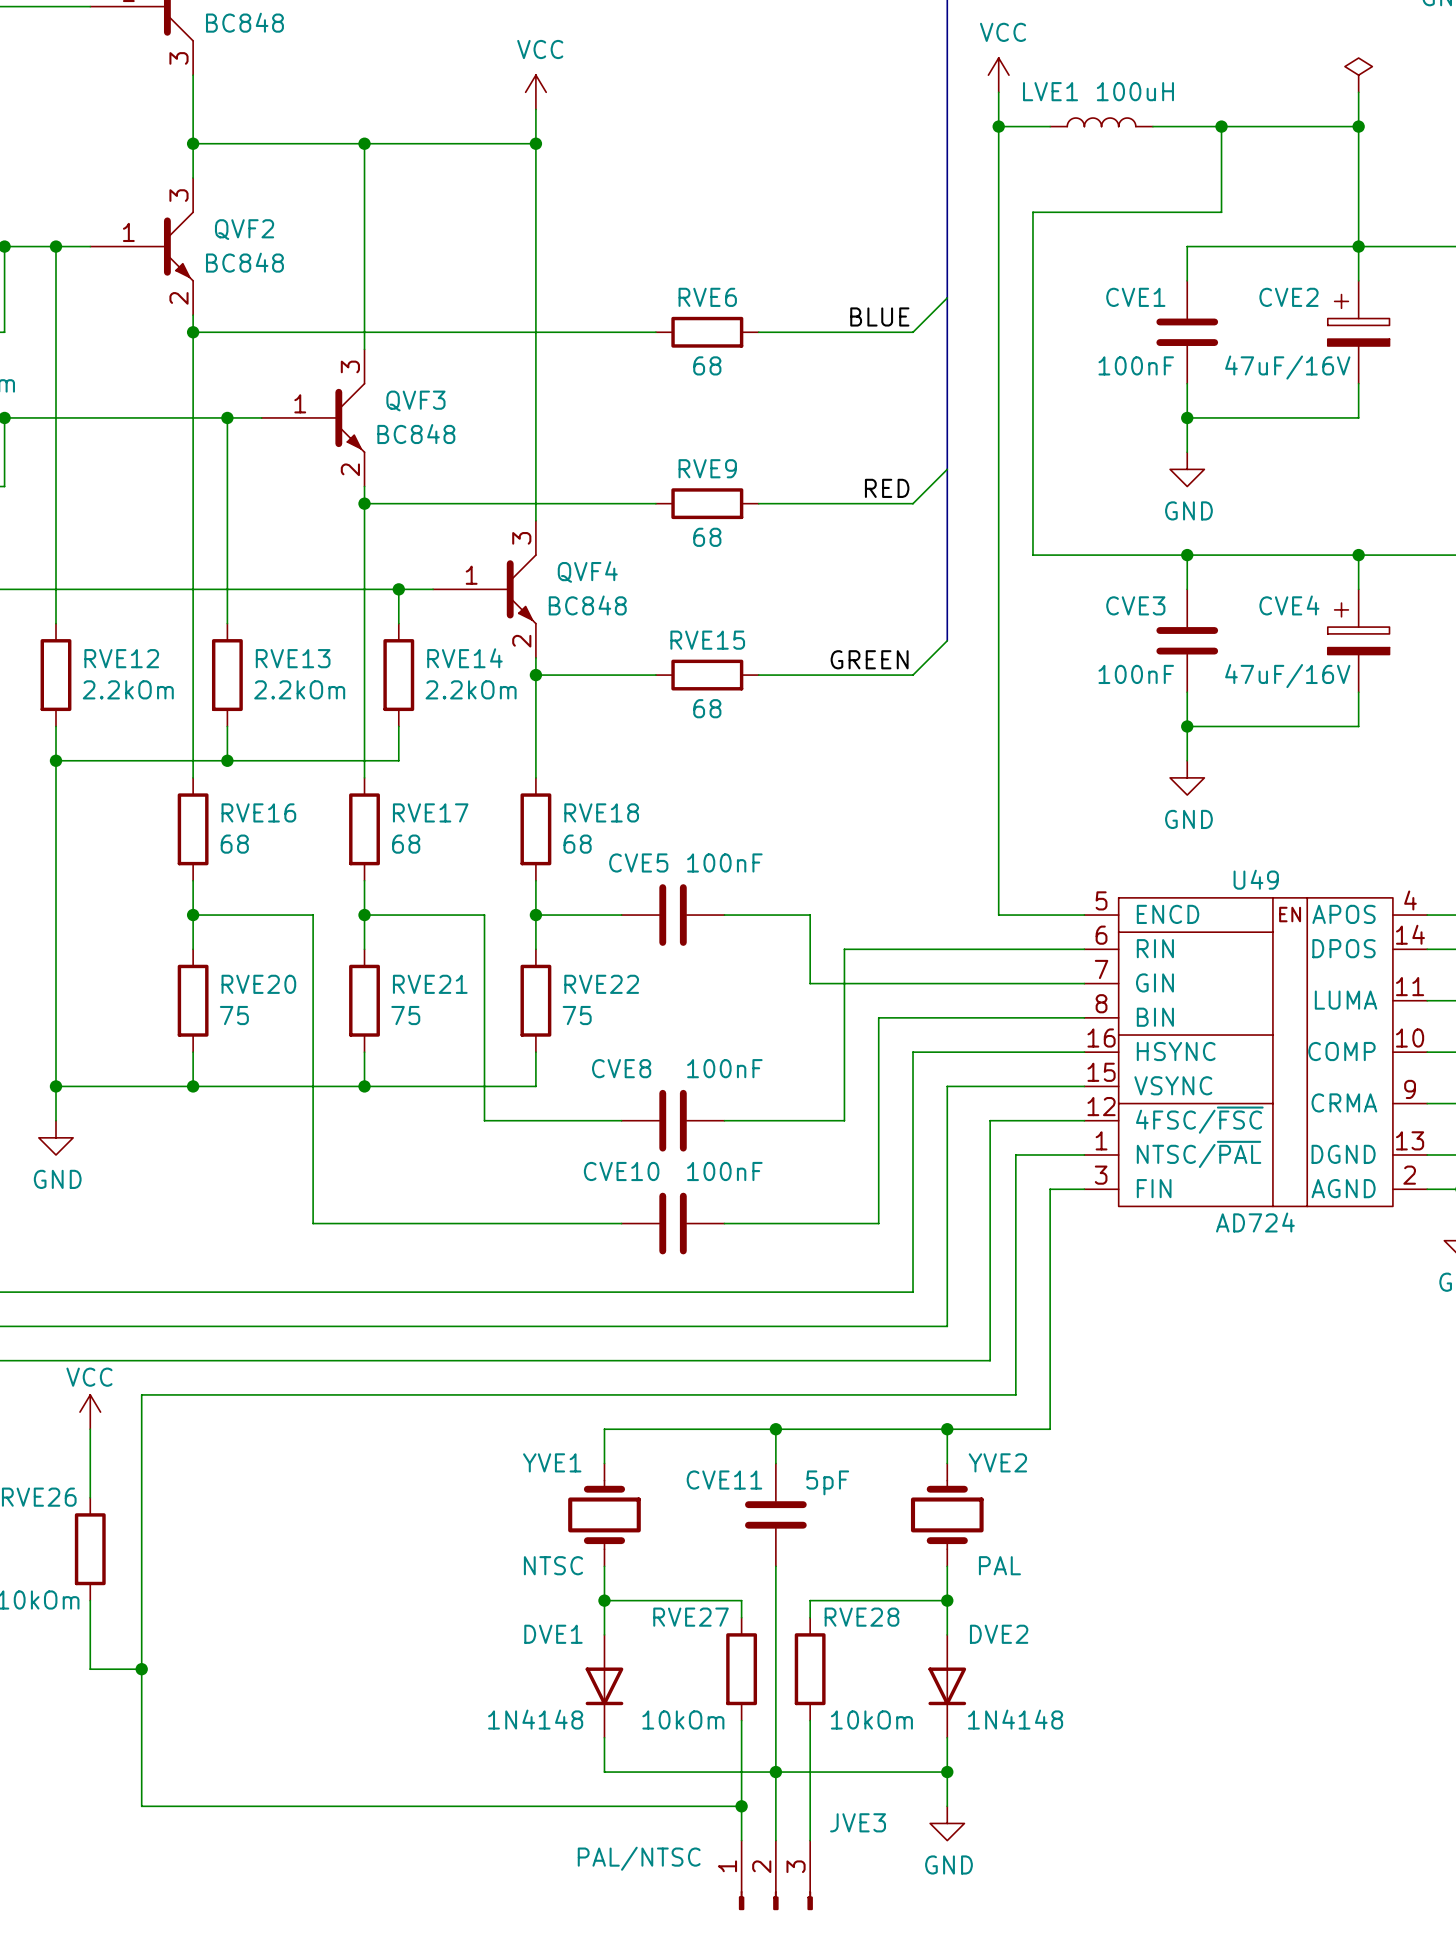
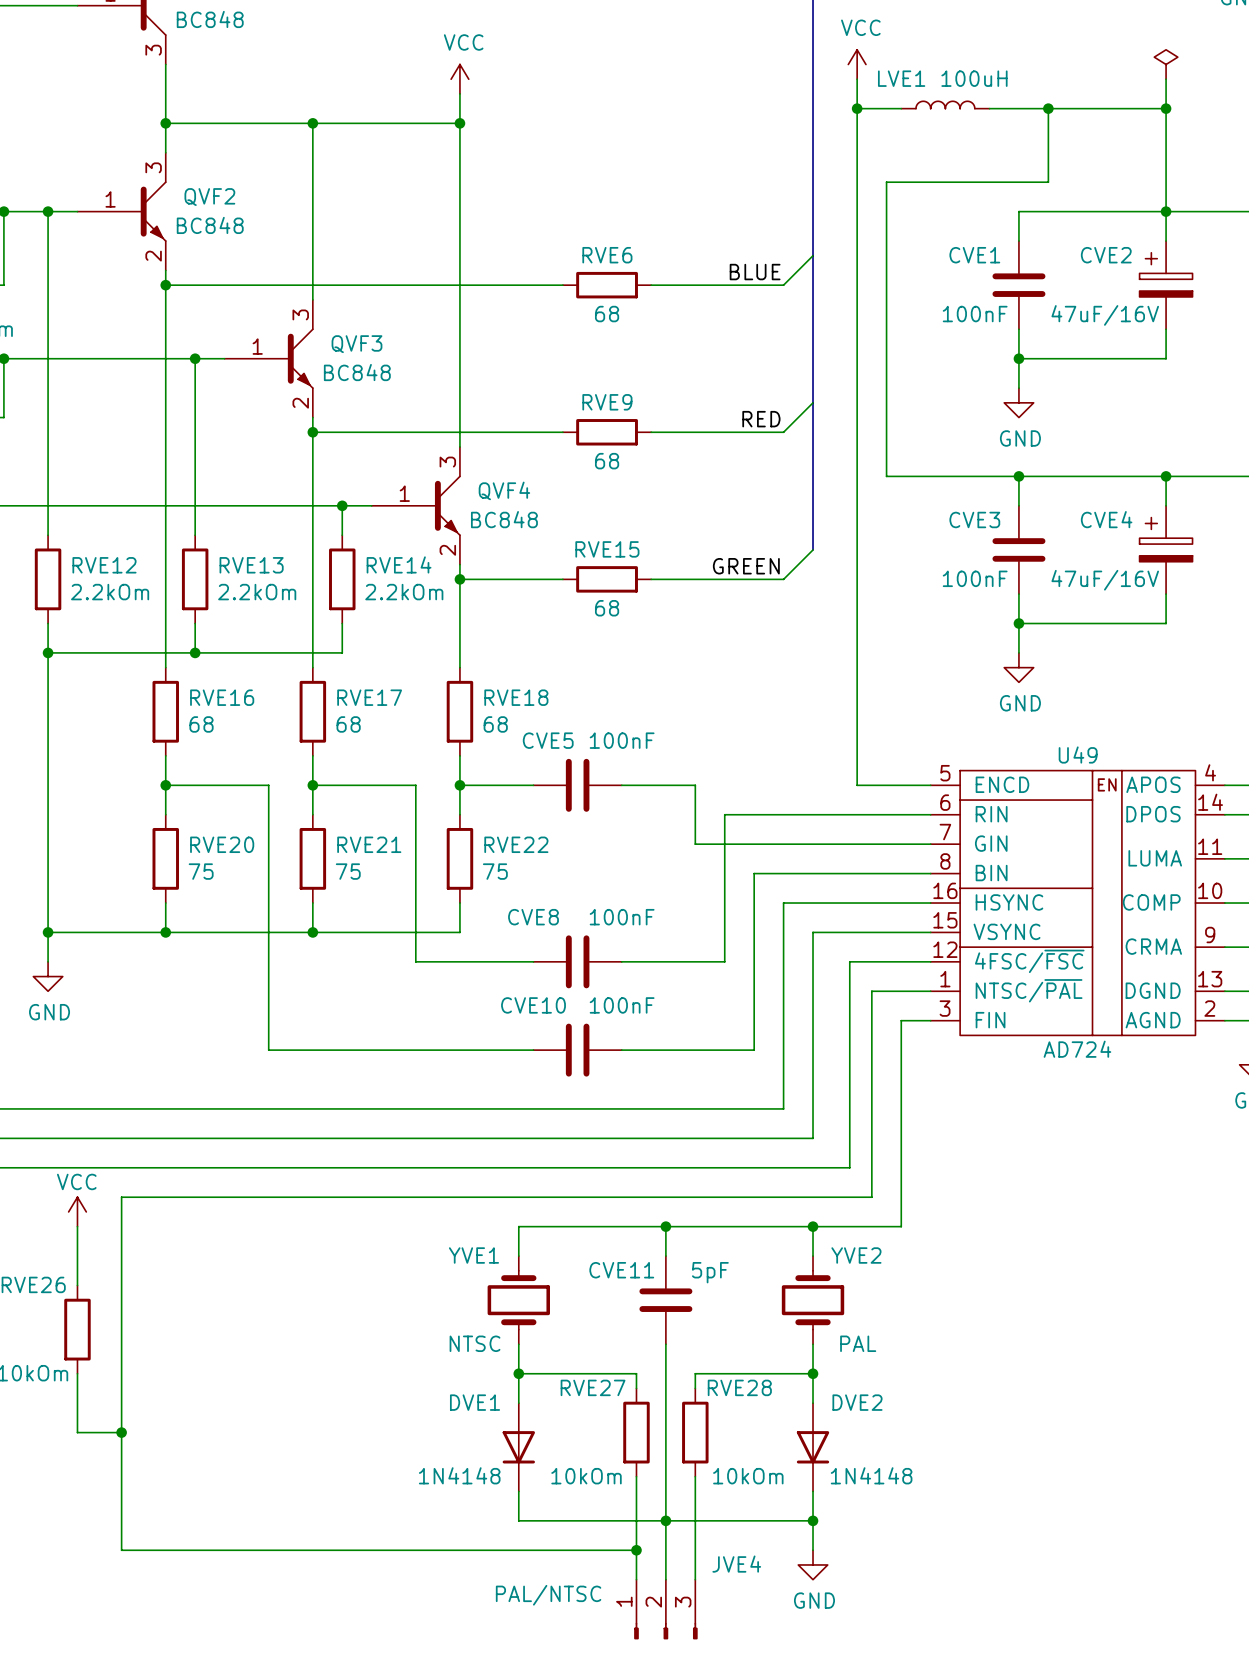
JVE3 name: JVE3 (858, 1822) -> JVE4 (736, 1564)

